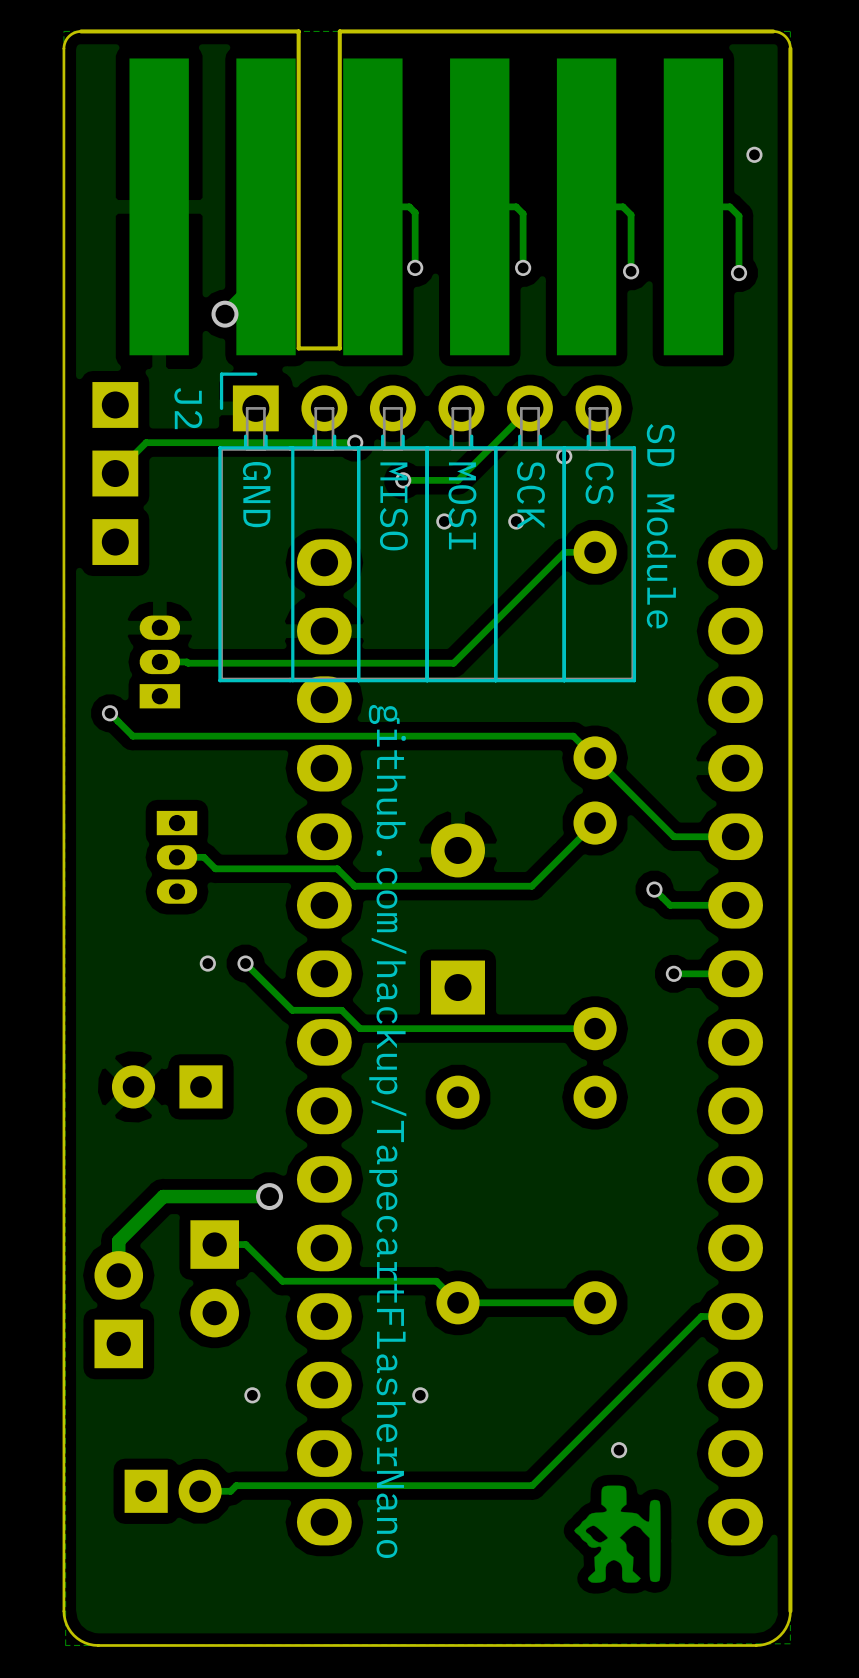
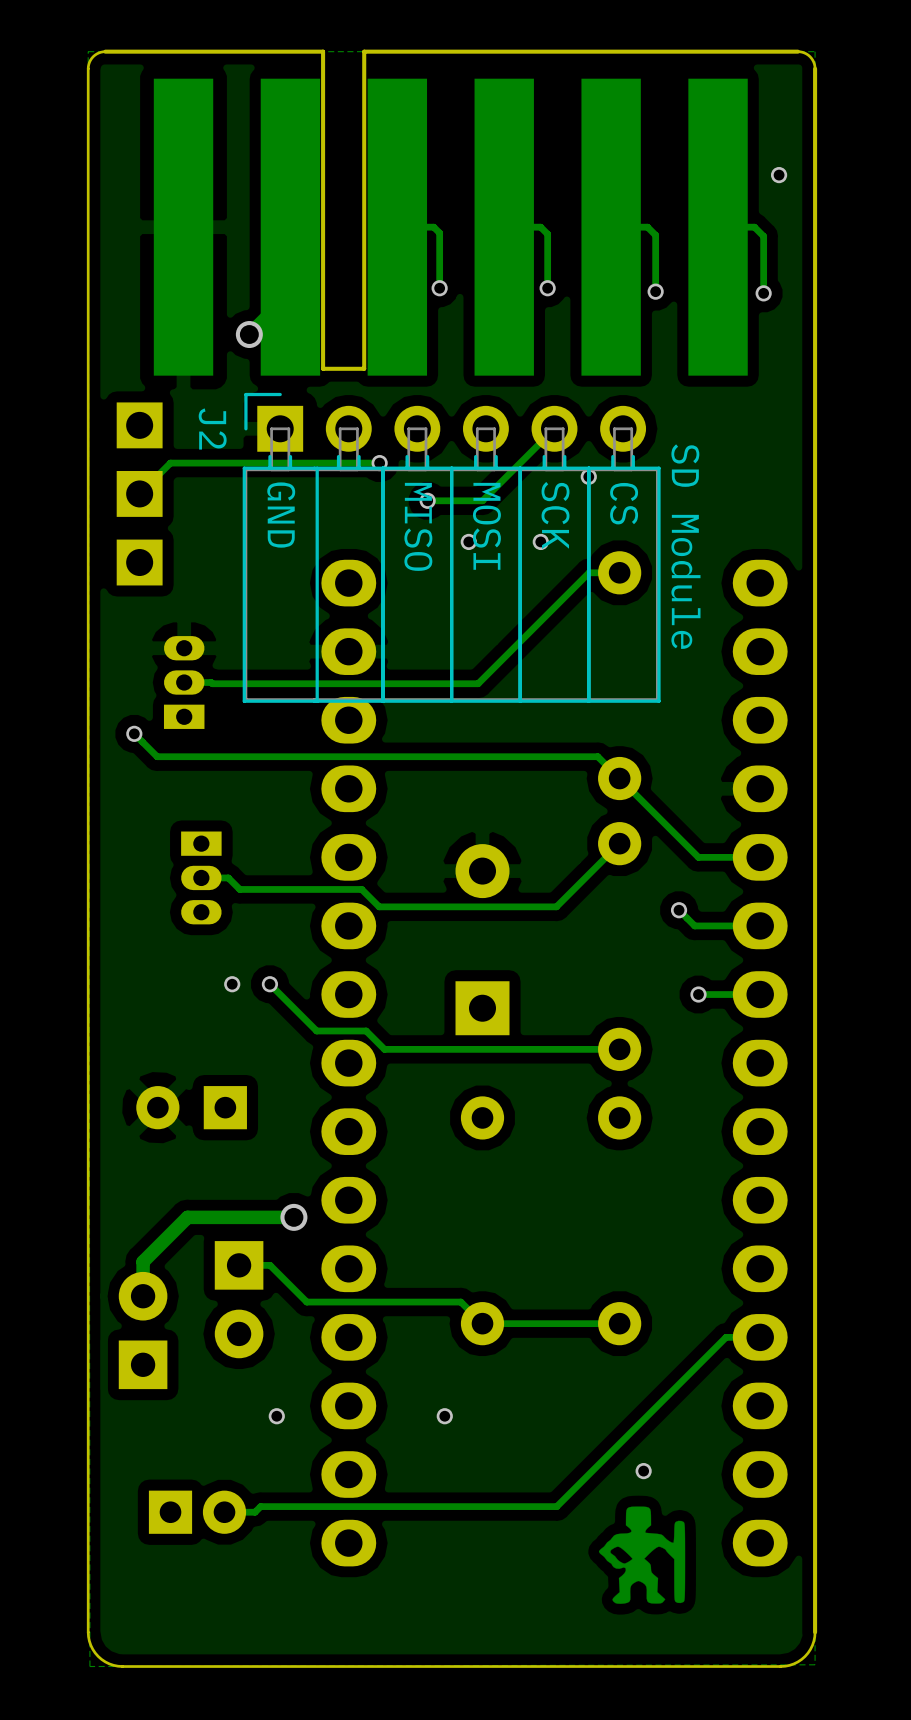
text: github.com/hackup/TapecartFlasherNano (387, 1131) -> none

